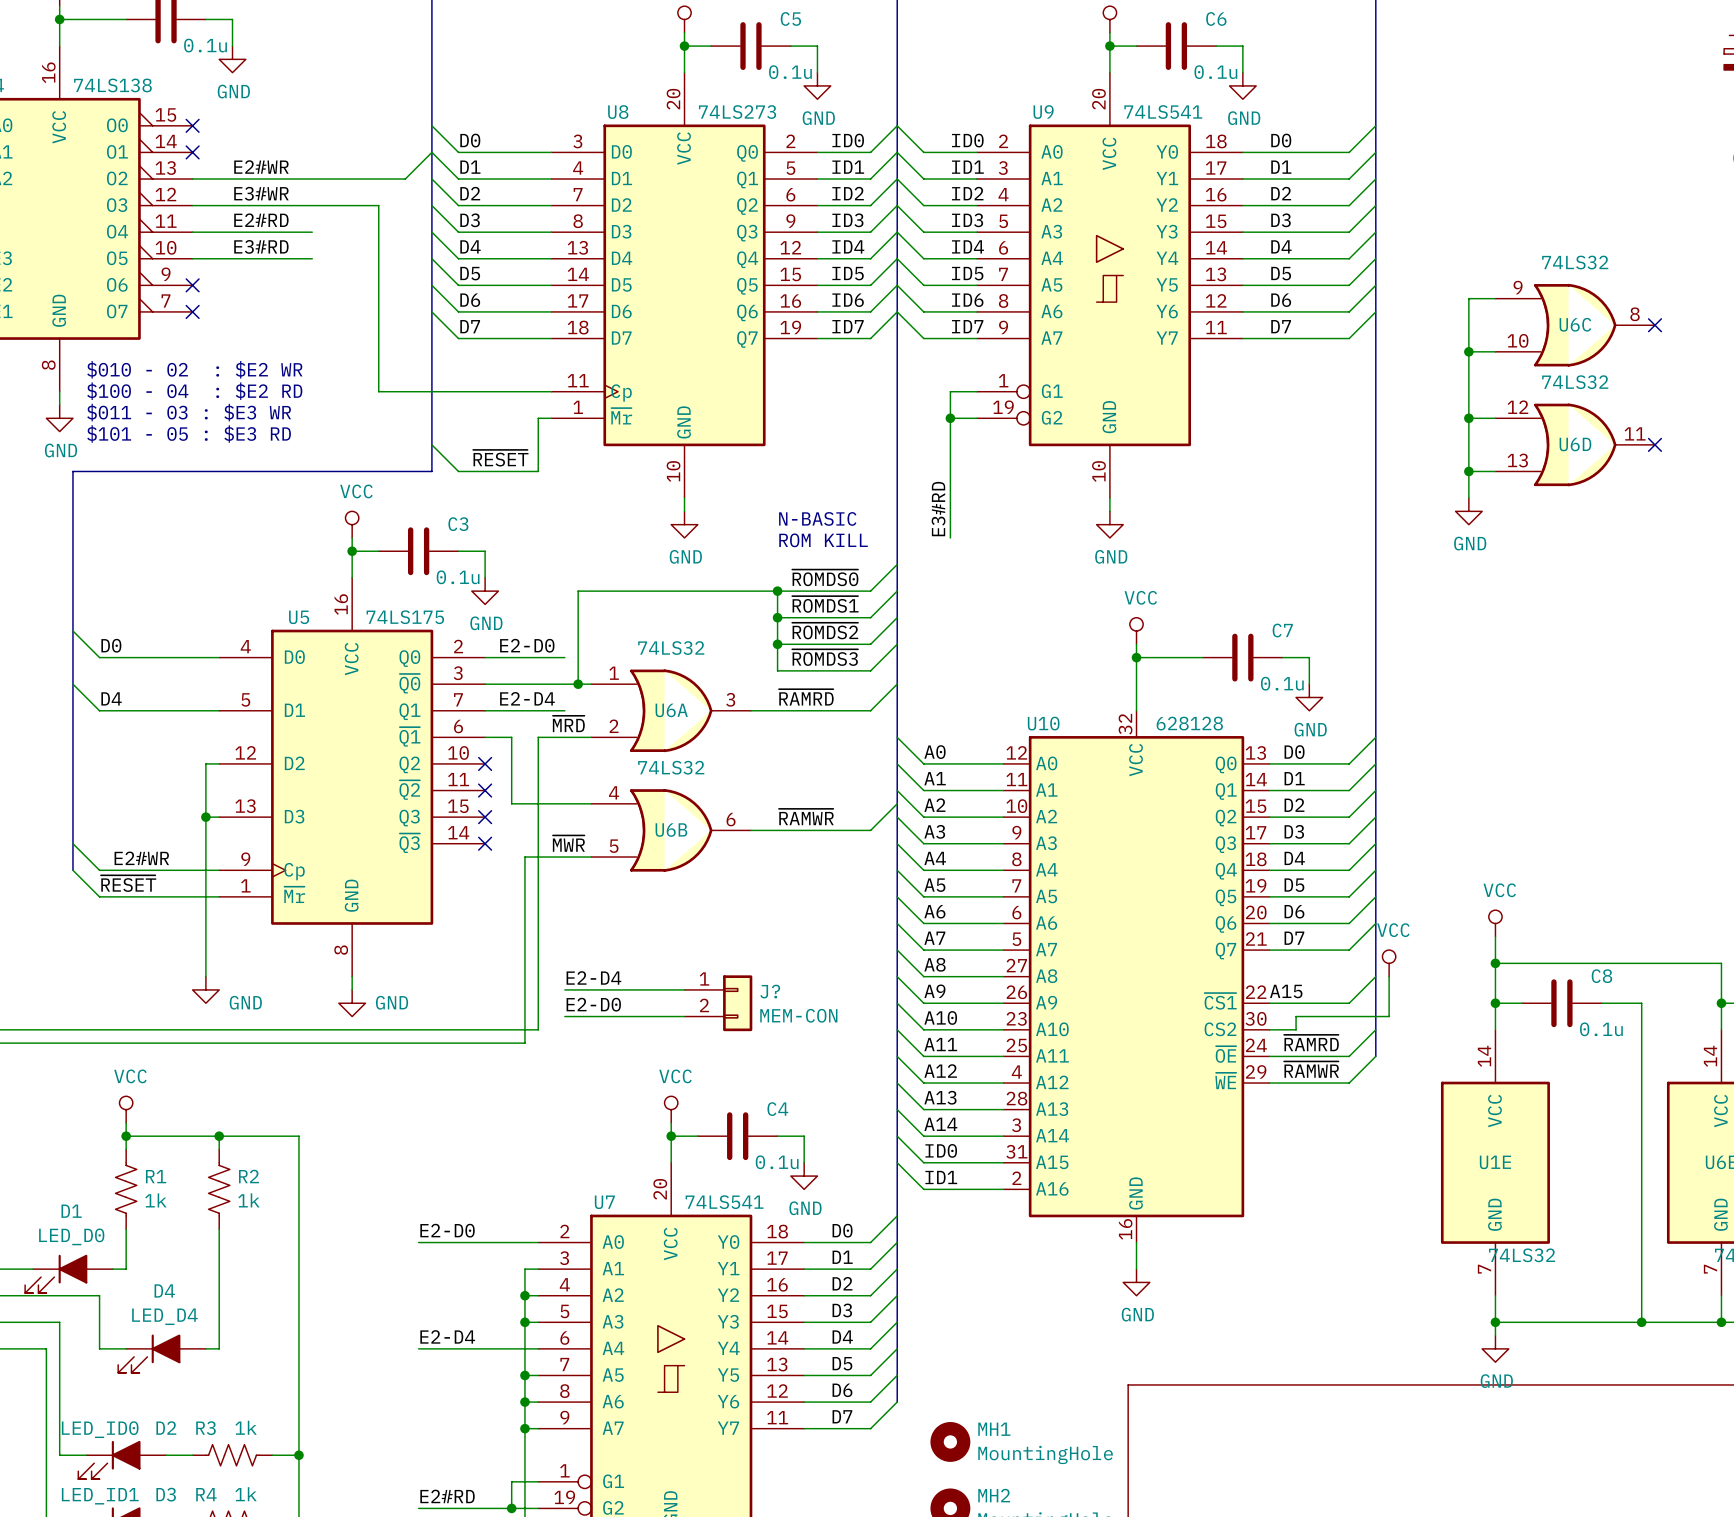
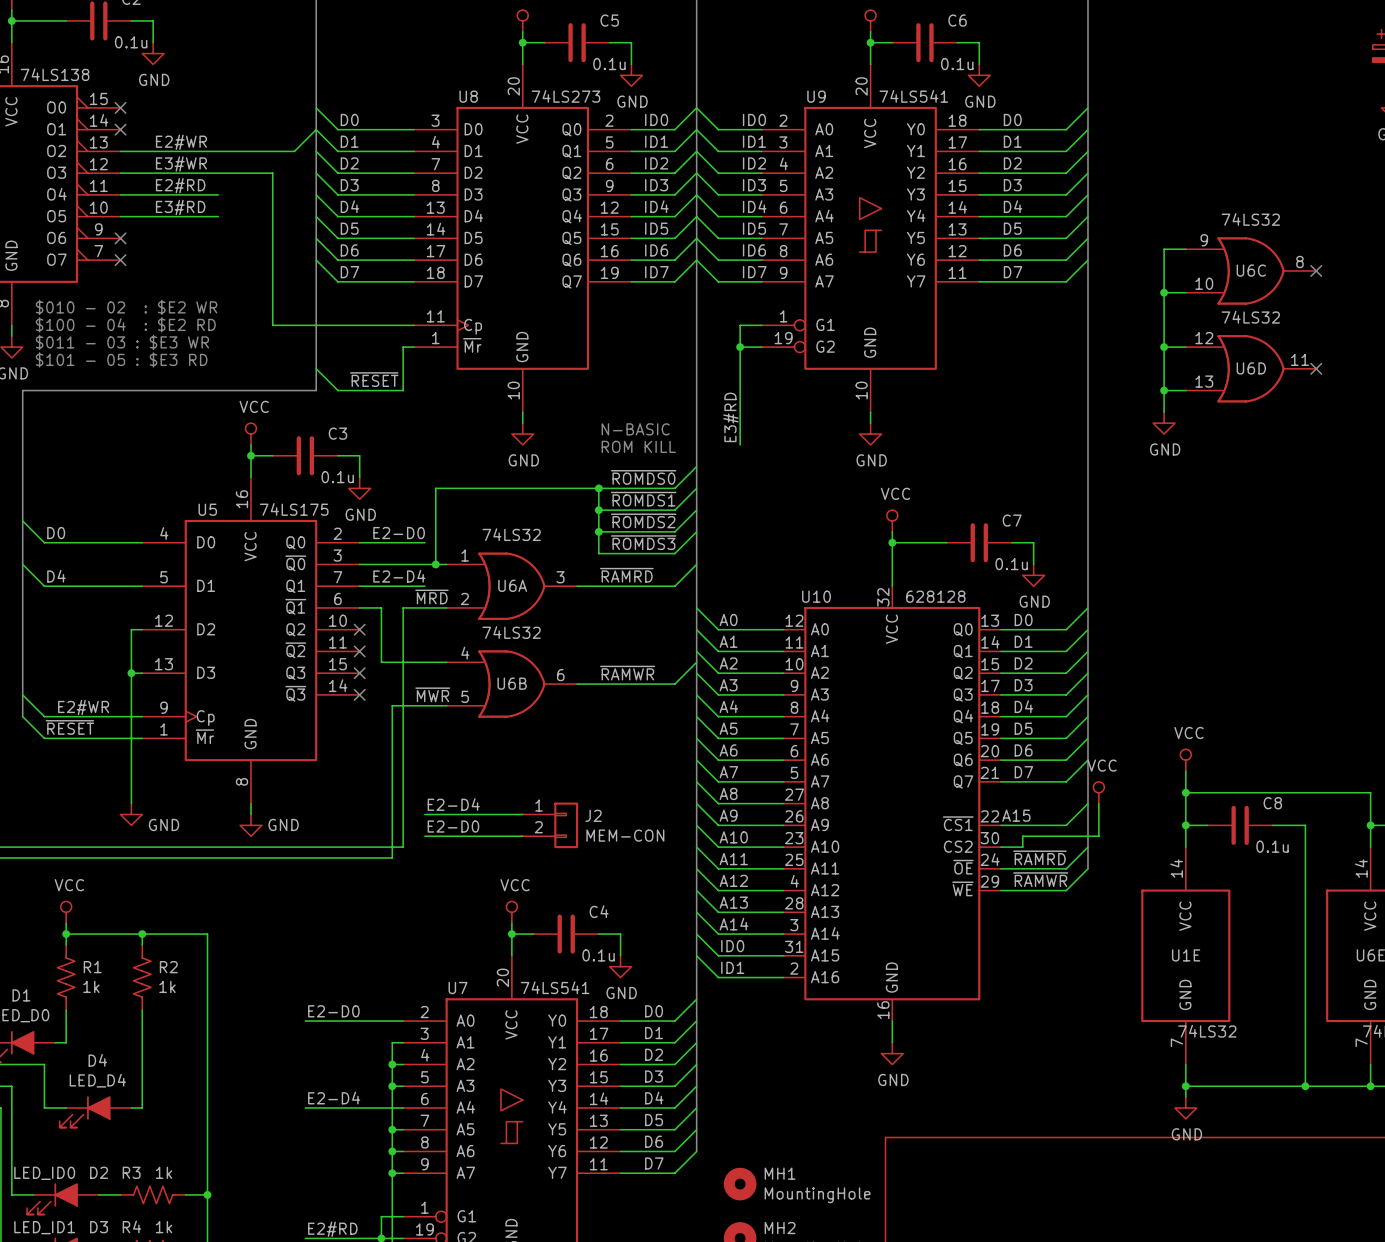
J? name: J? (770, 991) -> J2 (593, 815)

